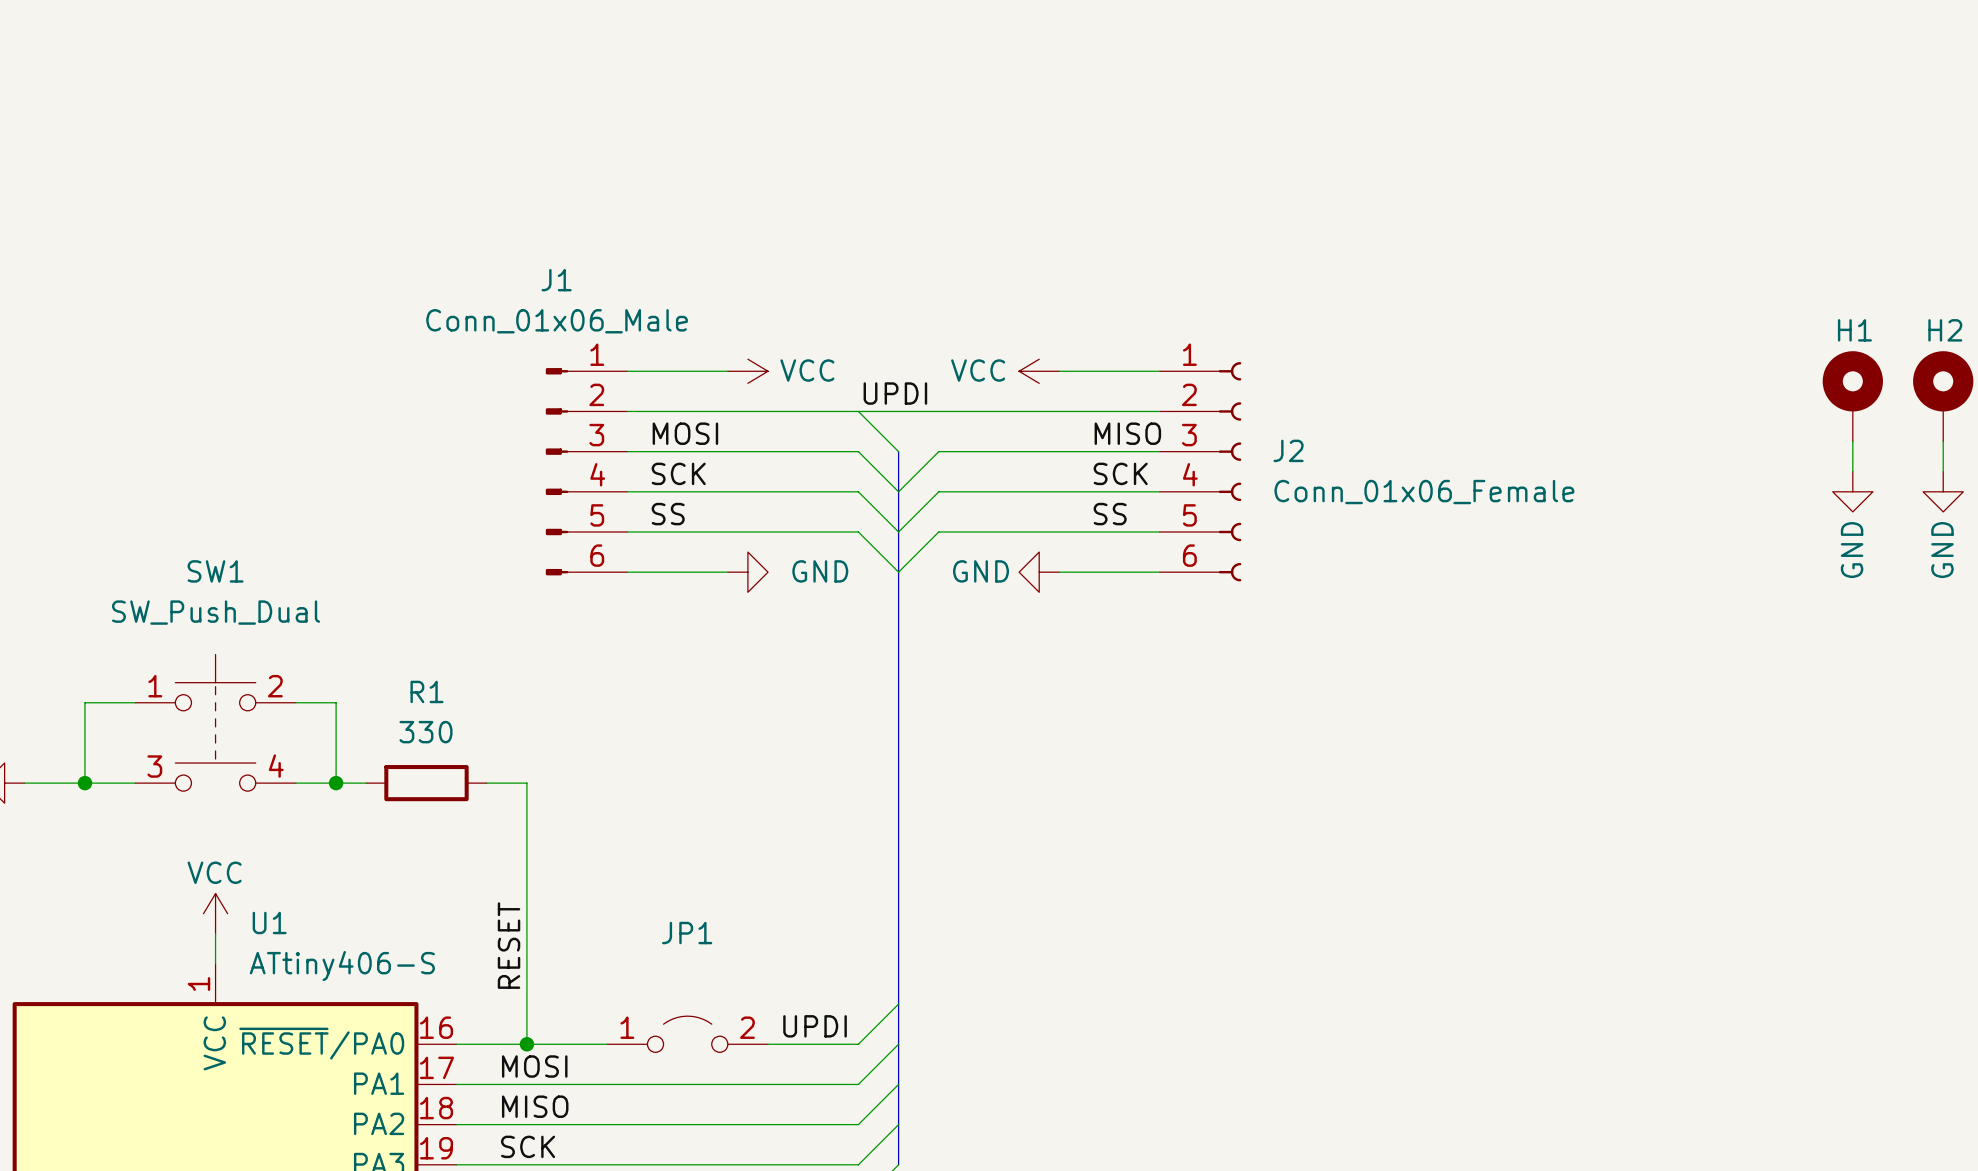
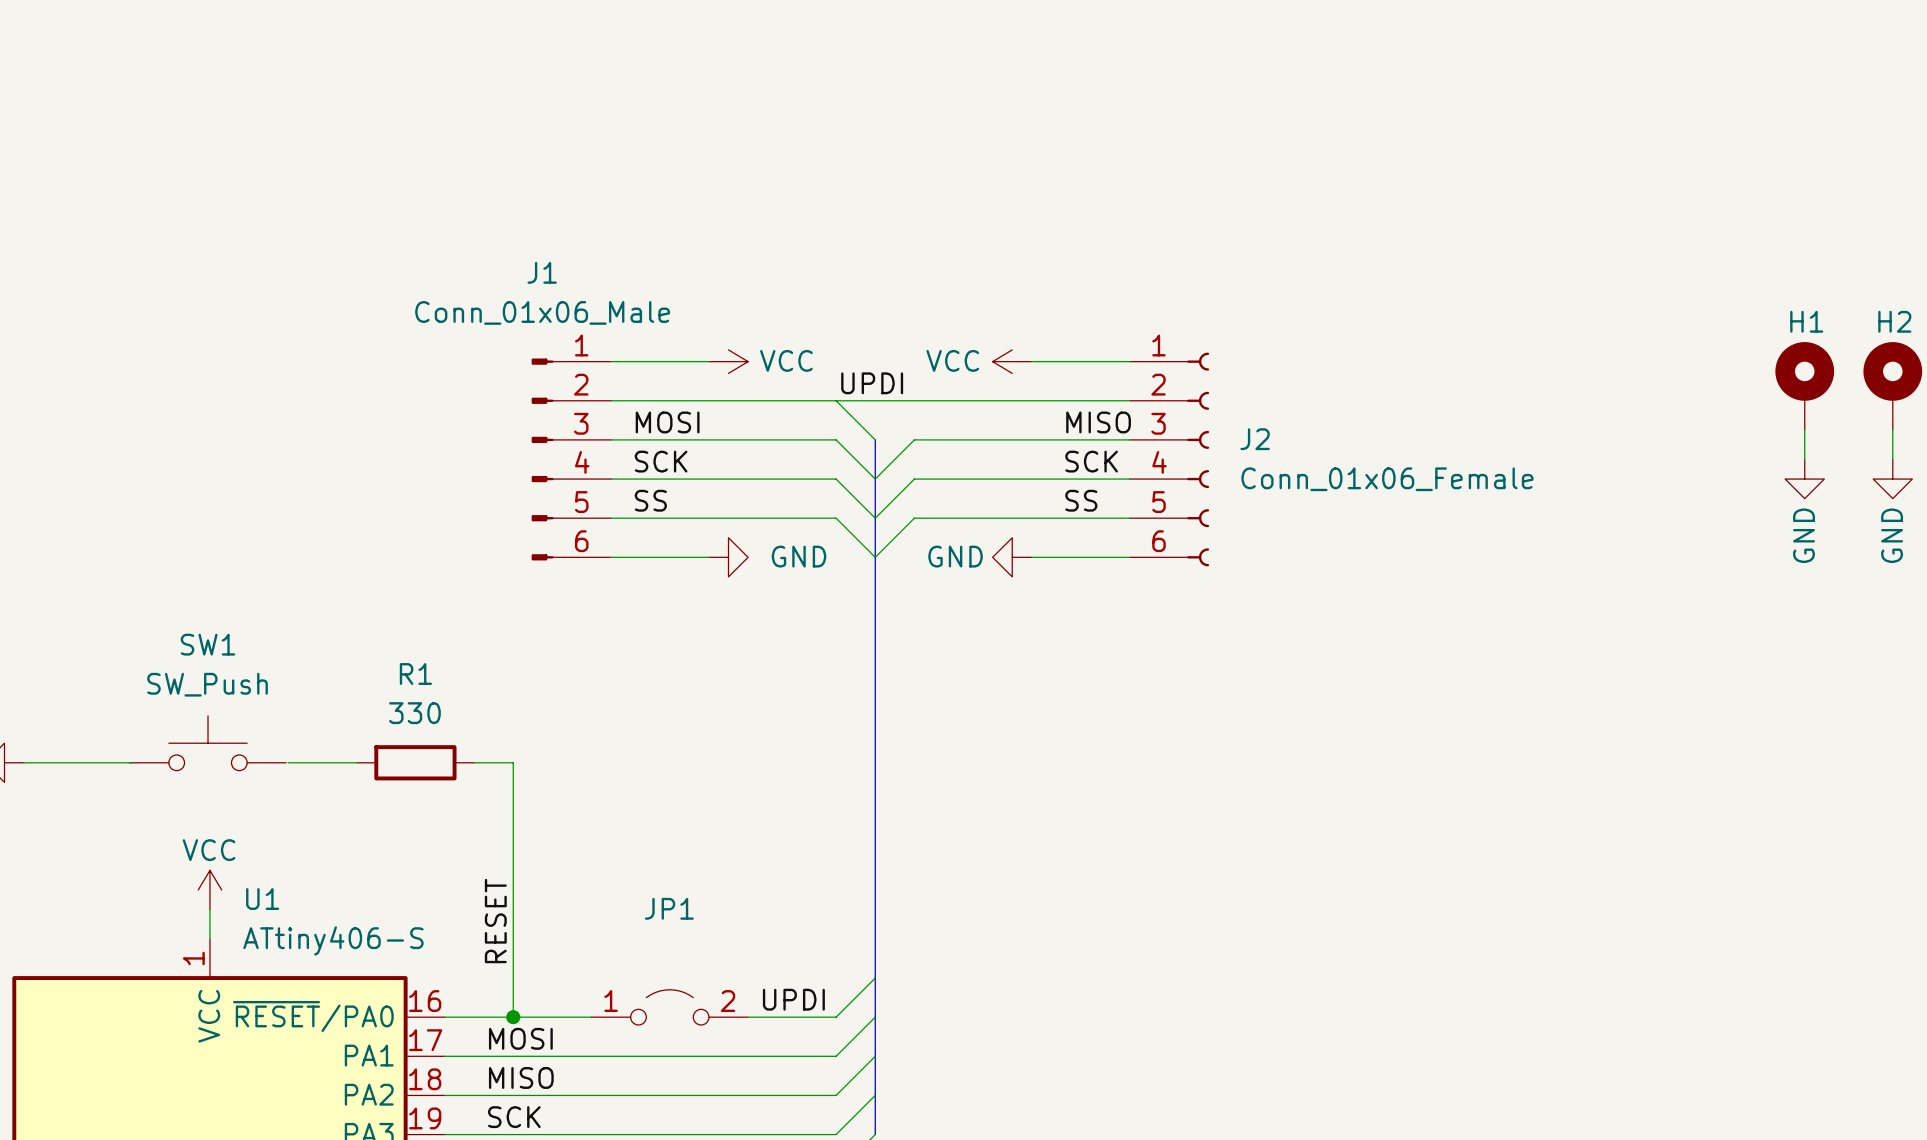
SW1 name position: SW1 (215, 571) -> SW1 (208, 644)
SW1 value: SW_Push_Dual (216, 612) -> SW_Push (207, 684)
SW1 symbol: [135, 654, 296, 792] -> [129, 715, 287, 771]
wire: (135, 702) (84, 702) (84, 783) -> none
wire: (295, 702) (336, 702) (336, 783) -> none
junction: (84, 783) -> none
junction: (336, 783) -> none

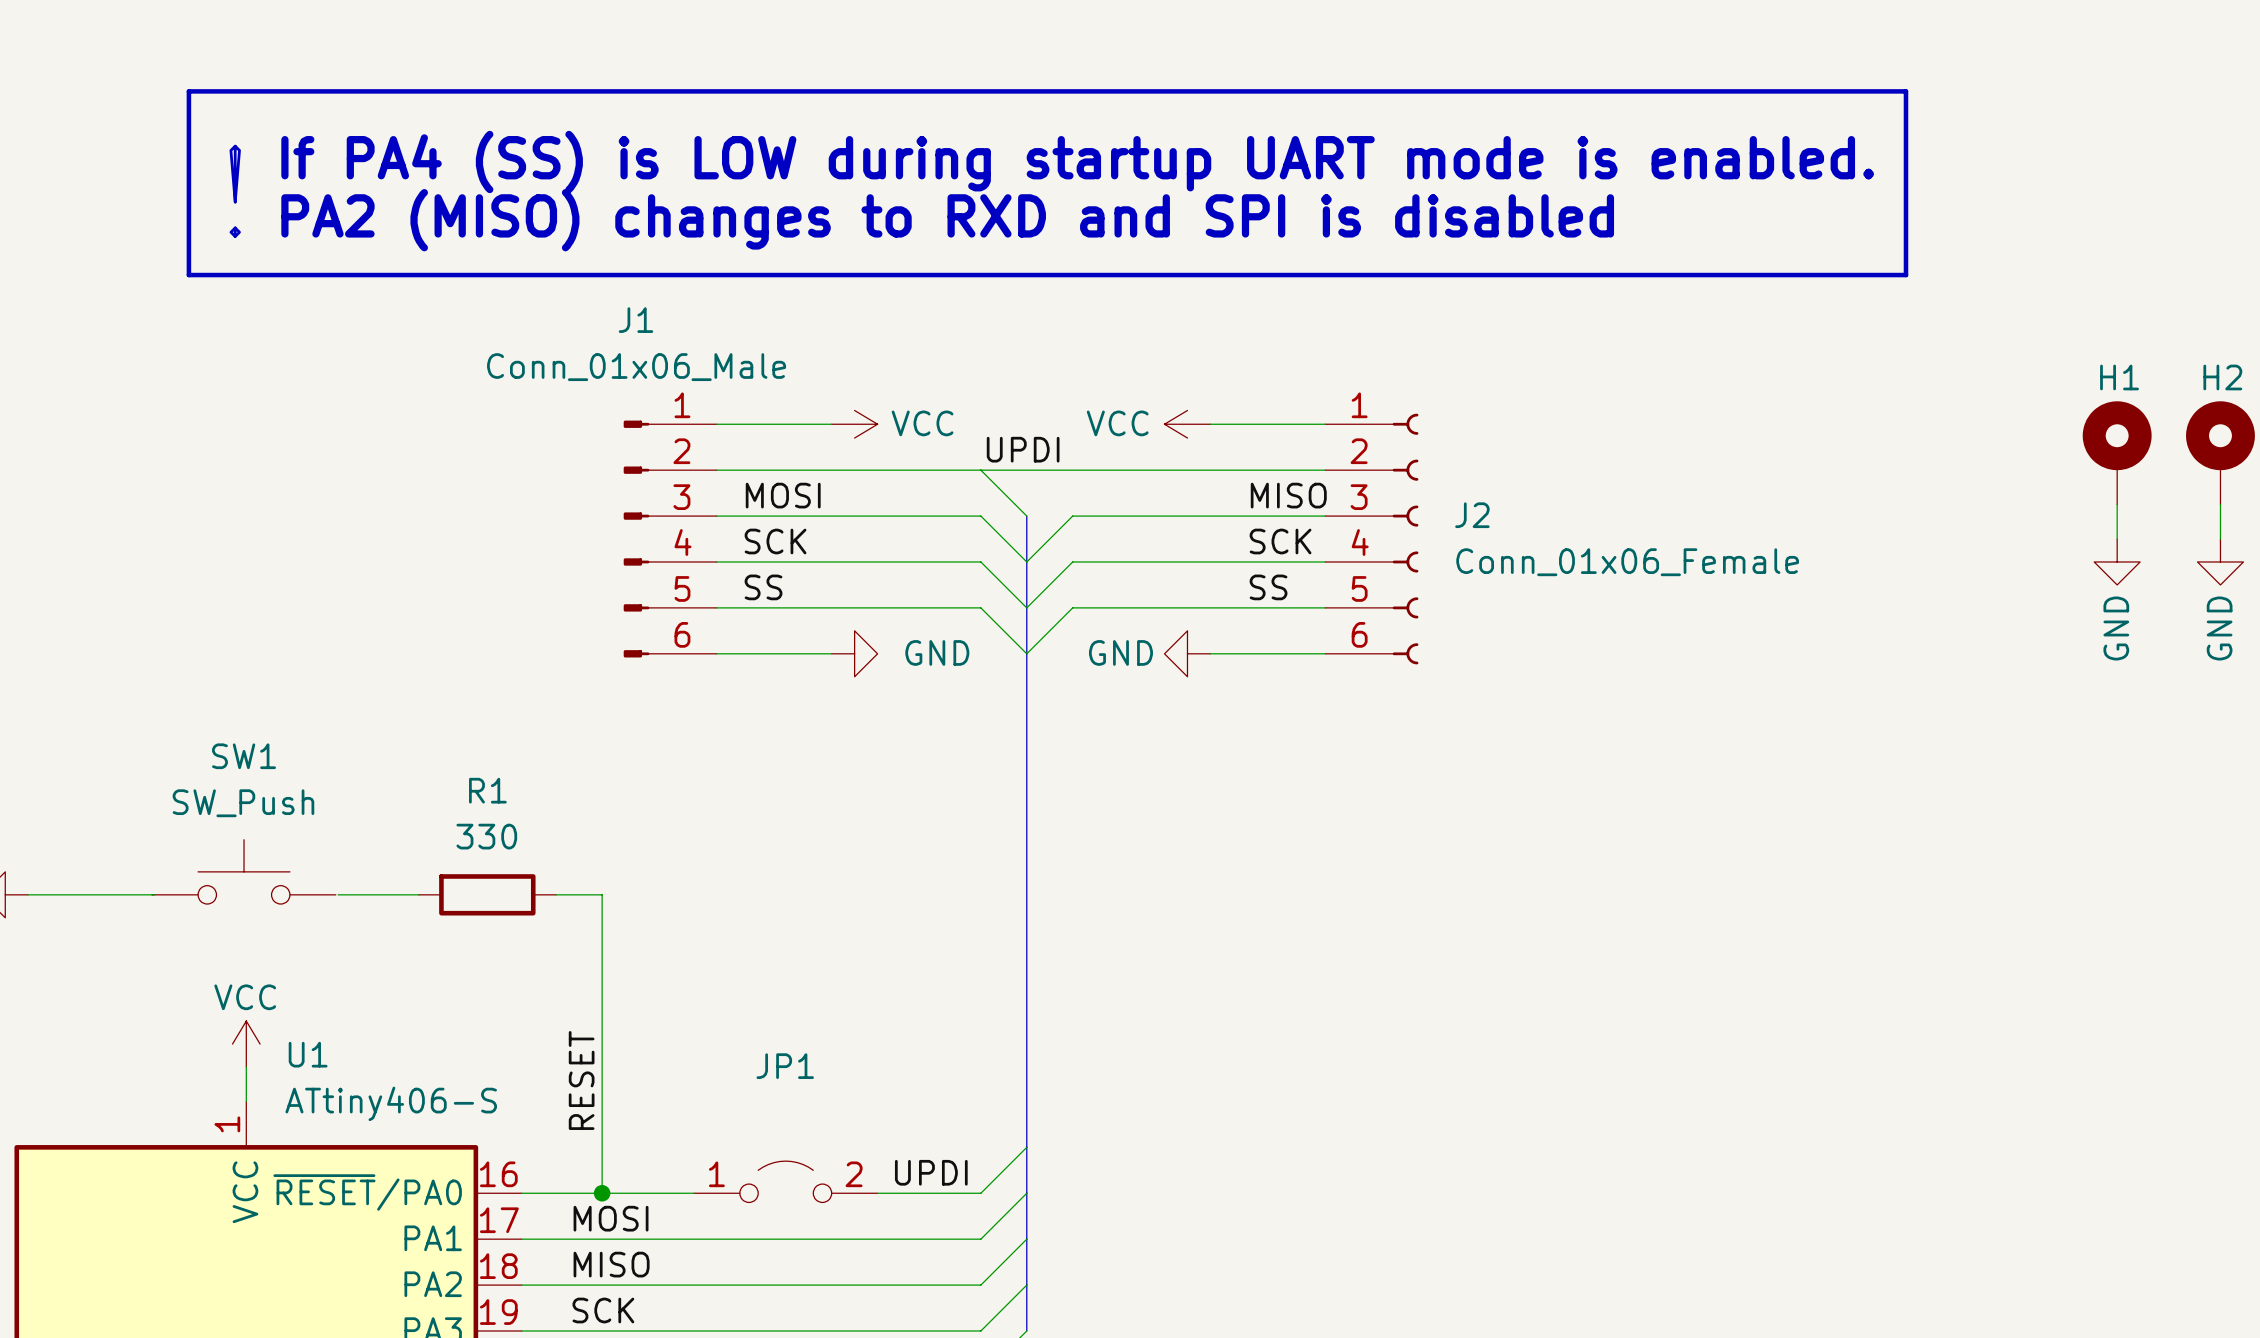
line: none -> (188, 91) (188, 275) (1905, 275) (1905, 91) (188, 91)
text: none -> If PA4 (SS) is LOW during startup UART mode is enabled. (1077, 161)
text: none -> ! (235, 191)
text: none -> PA2 (MISO) changes to RXD and SPI is disabled (947, 220)

